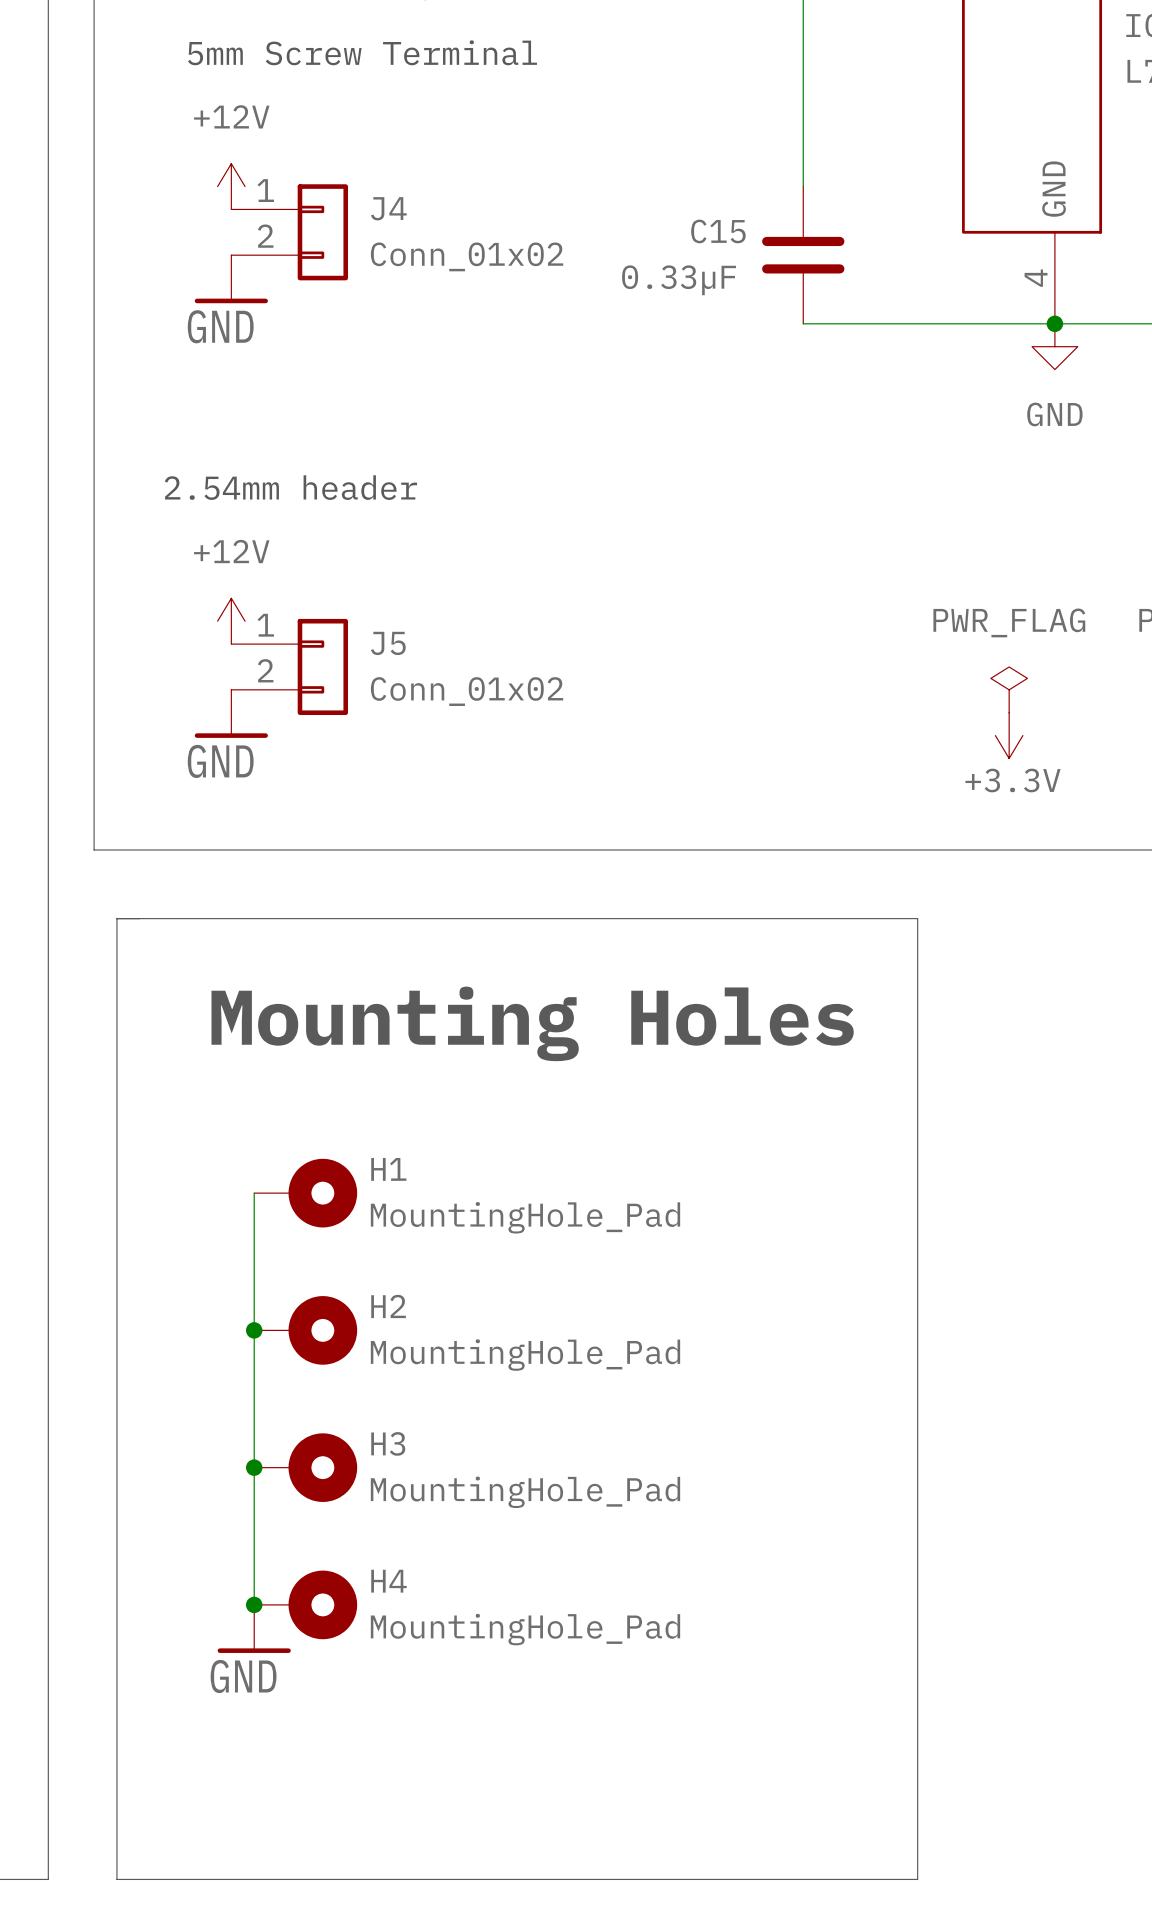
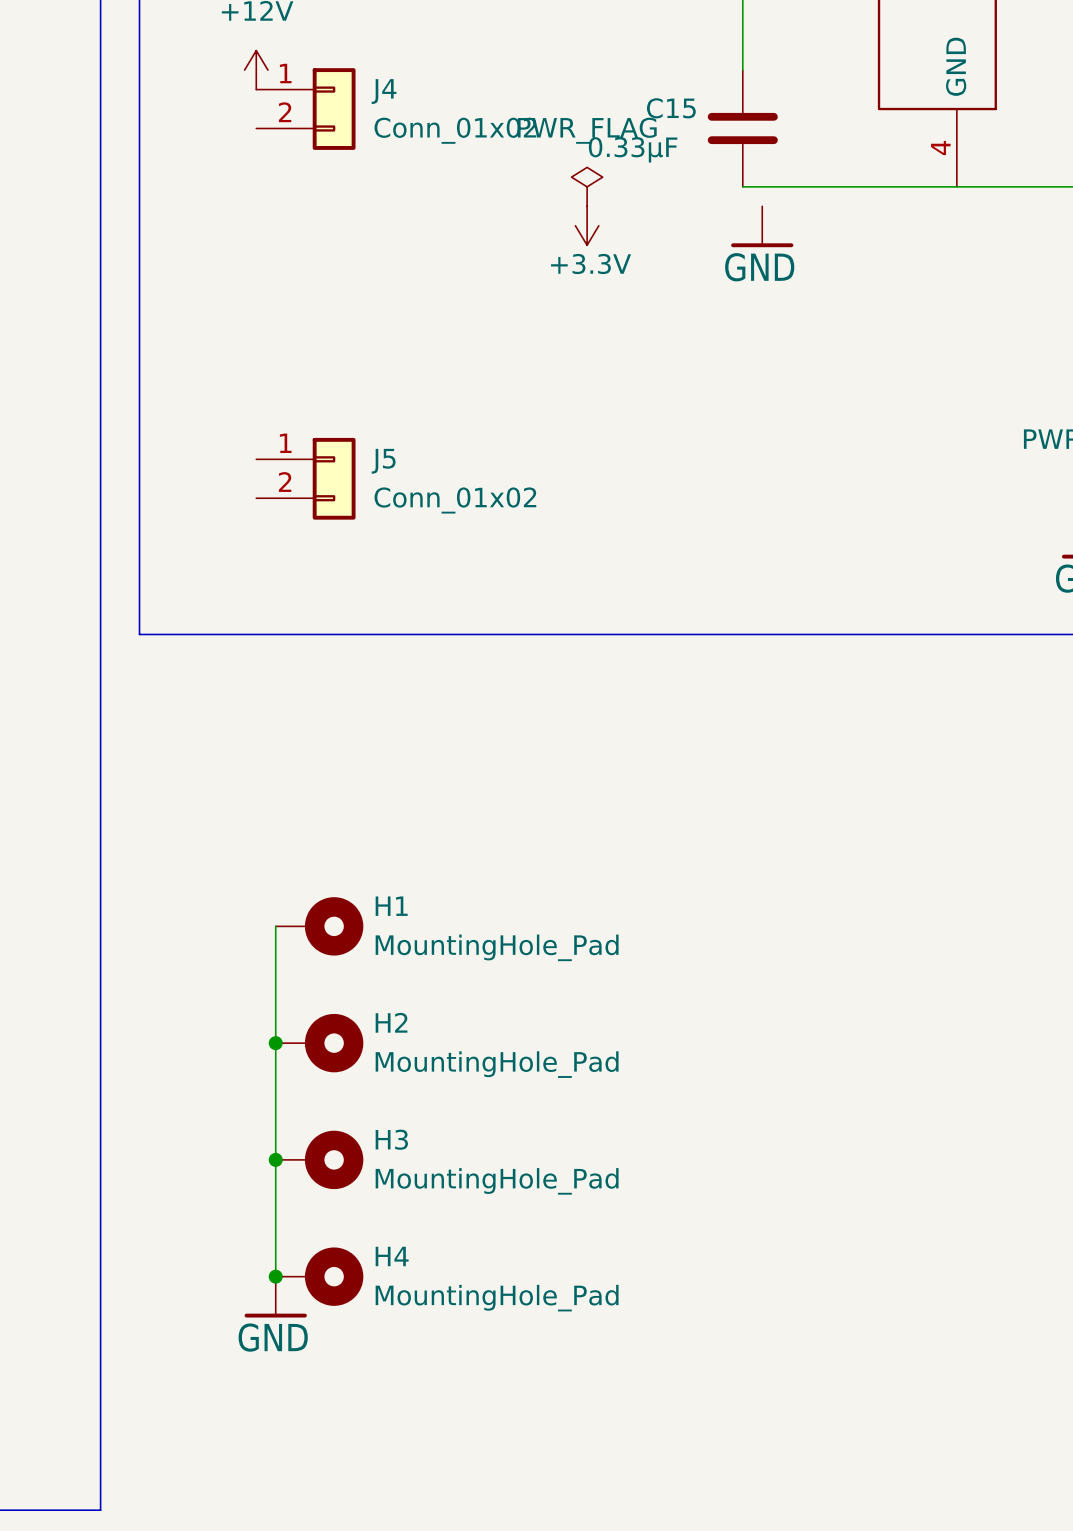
power symbol: GND (231, 279) -> none
power symbol: none -> PWR_FLAG (587, 186)
junction: (1054, 323) -> none
power symbol: GND (1054, 346) -> none
power symbol: none -> +3.3V (587, 225)
power symbol: none -> GND (762, 226)
text: 2.54mm header (290, 487) -> none
power symbol: +12V (231, 621) -> none
power symbol: PWR_FLAG (1009, 689) -> none
power symbol: GND (231, 713) -> none
power symbol: +3.3V (1009, 735) -> none
line: (116, 918) (917, 918) (917, 1879) (116, 1879) (116, 918) -> none
text: Mounting Holes (532, 1023) -> none

